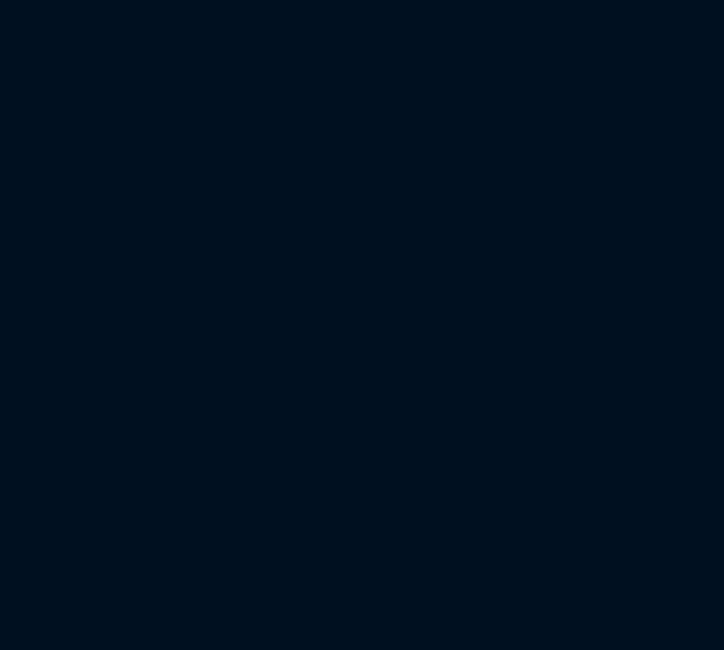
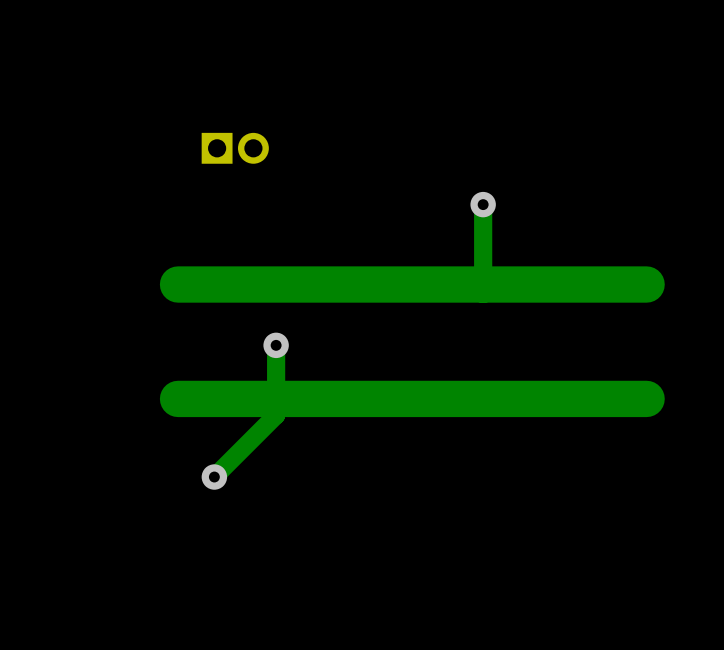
part: none -> (235, 148)
track: none -> (483, 204) (483, 284)
via: none -> (483, 204)
track: none -> (646, 284) (178, 284)
track: none -> (276, 345) (276, 415) (214, 477)
via: none -> (276, 345)
track: none -> (646, 398) (178, 398)
via: none -> (214, 477)

